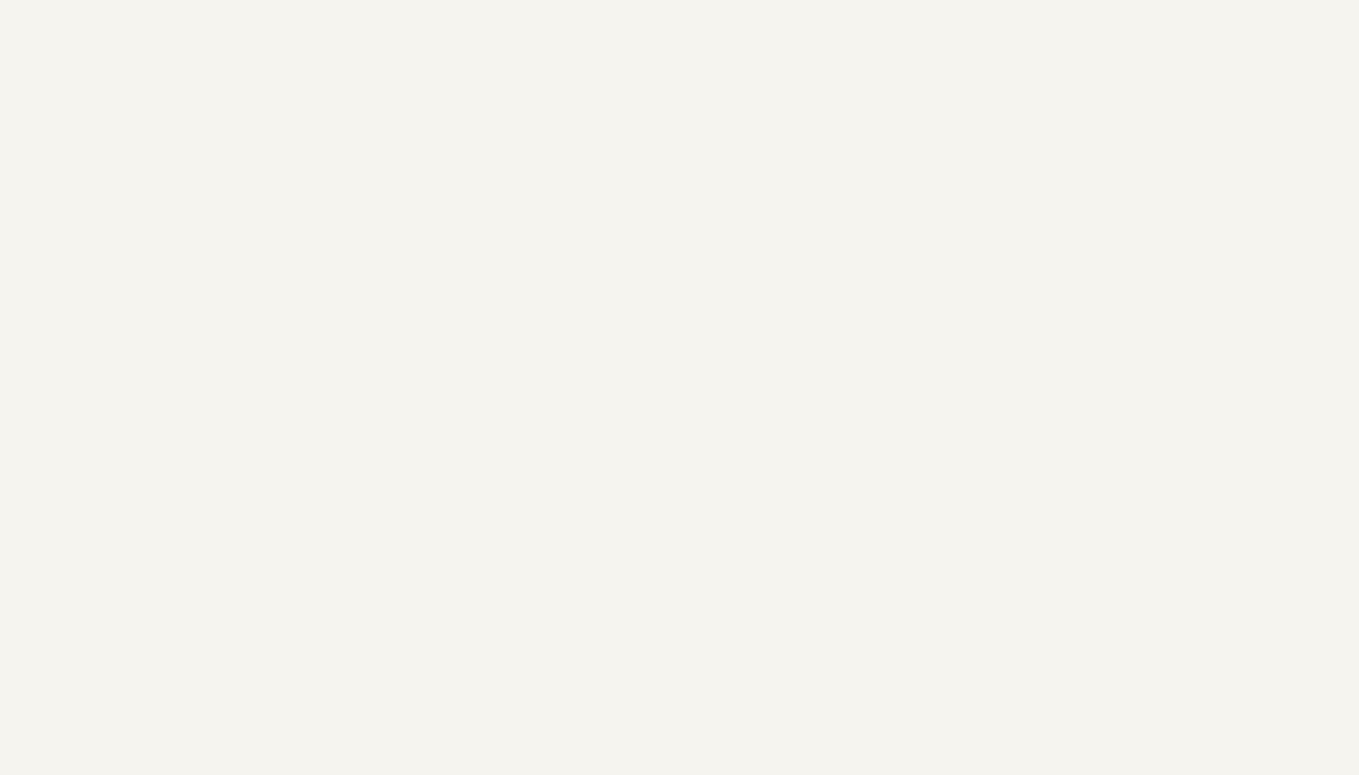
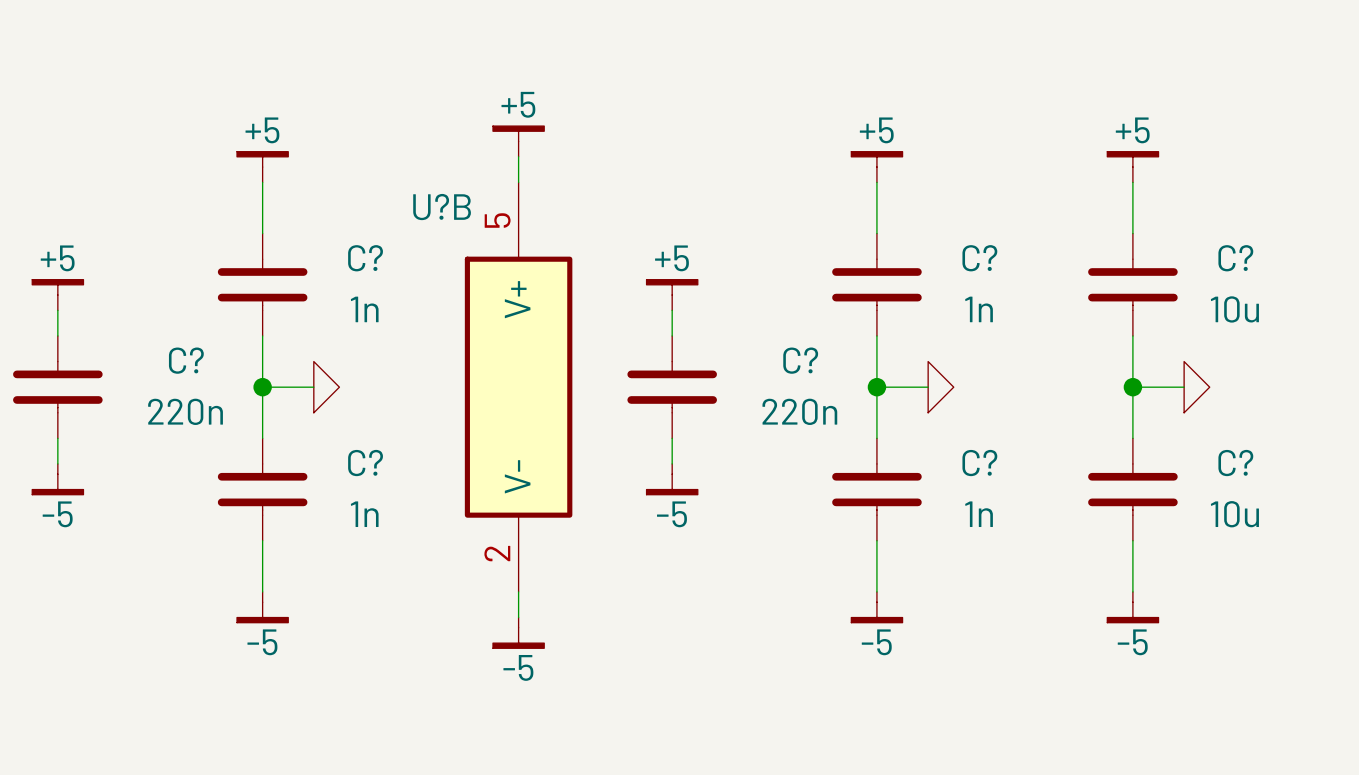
power symbol: none -> +5 (518, 141)
wire: none -> (518, 156) (518, 182)
power symbol: none -> +5 (262, 167)
power symbol: none -> +5 (876, 167)
power symbol: none -> +5 (1132, 167)
wire: none -> (262, 182) (262, 233)
wire: none -> (876, 182) (876, 233)
wire: none -> (1132, 182) (1132, 233)
C?: none -> 1n (262, 284)
C?: none -> 1n (876, 284)
C?: none -> 10u (1132, 284)
power symbol: none -> +5 (57, 295)
power symbol: none -> +5 (672, 295)
wire: none -> (57, 310) (57, 335)
wire: none -> (672, 310) (672, 335)
wire: none -> (262, 335) (262, 438)
wire: none -> (876, 335) (876, 438)
wire: none -> (1132, 335) (1132, 438)
C?: none -> 220n (57, 387)
wire: none -> (262, 387) (313, 387)
junction: none -> (262, 387)
power symbol: none -> (326, 387)
U?B: none -> (518, 387)
C?: none -> 220n (672, 387)
wire: none -> (876, 387) (928, 387)
junction: none -> (876, 387)
power symbol: none -> (940, 387)
wire: none -> (1132, 387) (1184, 387)
junction: none -> (1132, 387)
power symbol: none -> (1196, 387)
wire: none -> (57, 438) (57, 463)
wire: none -> (672, 438) (672, 463)
power symbol: none -> -5 (57, 479)
power symbol: none -> -5 (672, 479)
C?: none -> 1n (262, 489)
C?: none -> 1n (876, 489)
C?: none -> 10u (1132, 489)
wire: none -> (262, 540) (262, 591)
wire: none -> (876, 540) (876, 591)
wire: none -> (1132, 540) (1132, 591)
wire: none -> (518, 591) (518, 617)
power symbol: none -> -5 (262, 607)
power symbol: none -> -5 (876, 607)
power symbol: none -> -5 (1132, 607)
power symbol: none -> -5 (518, 632)

